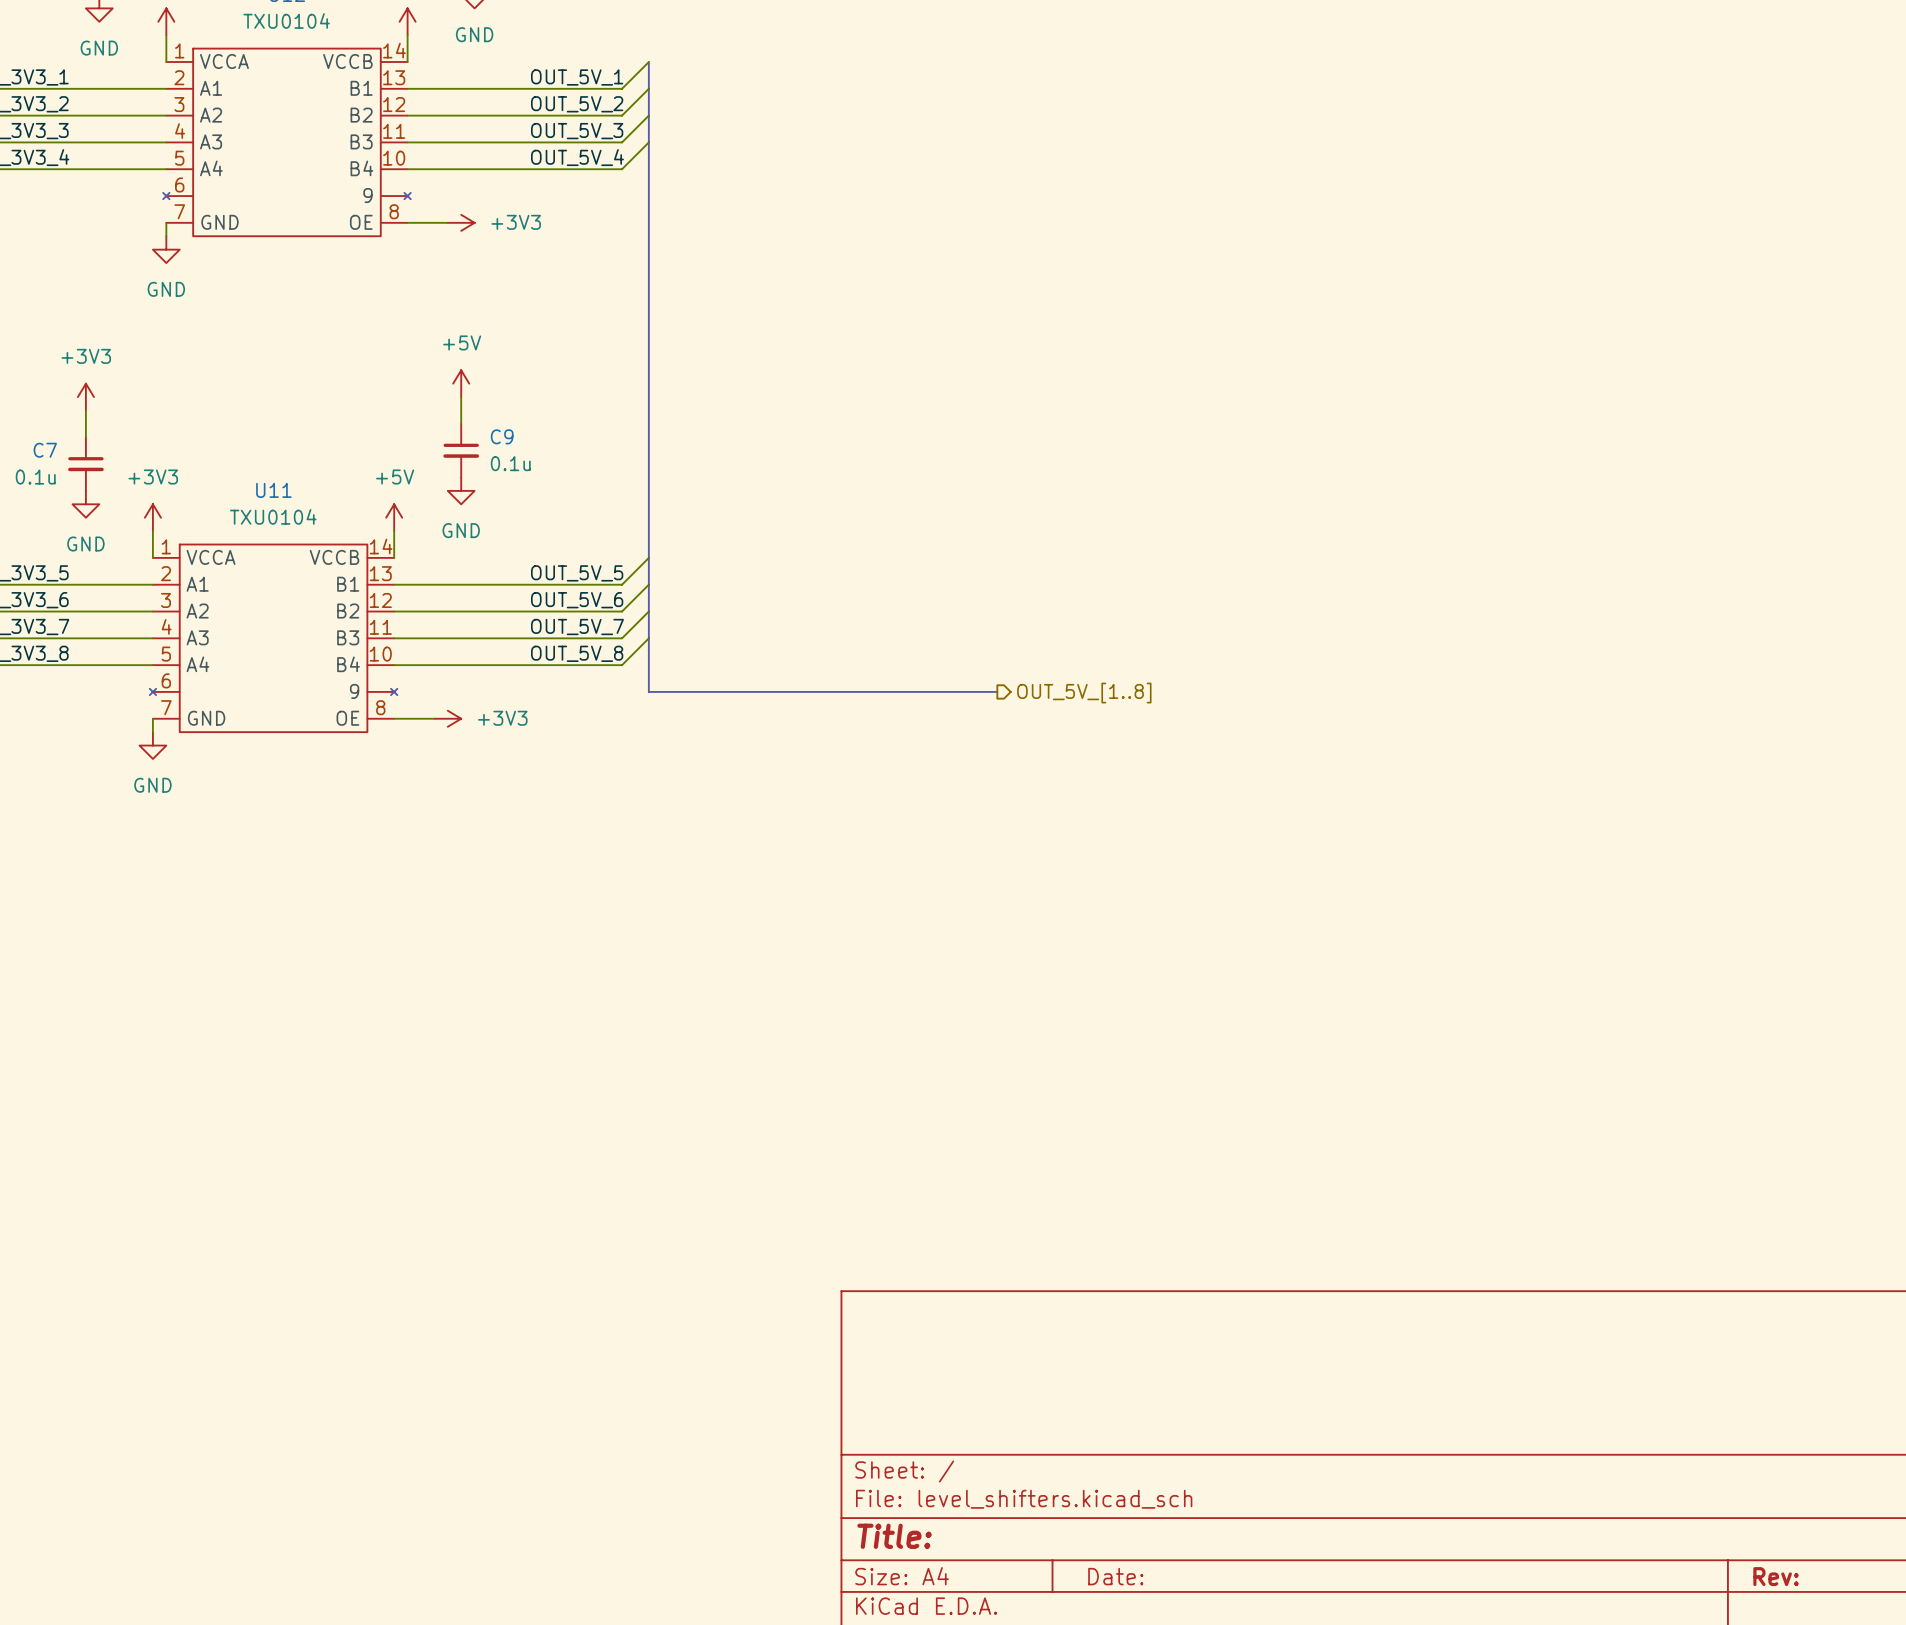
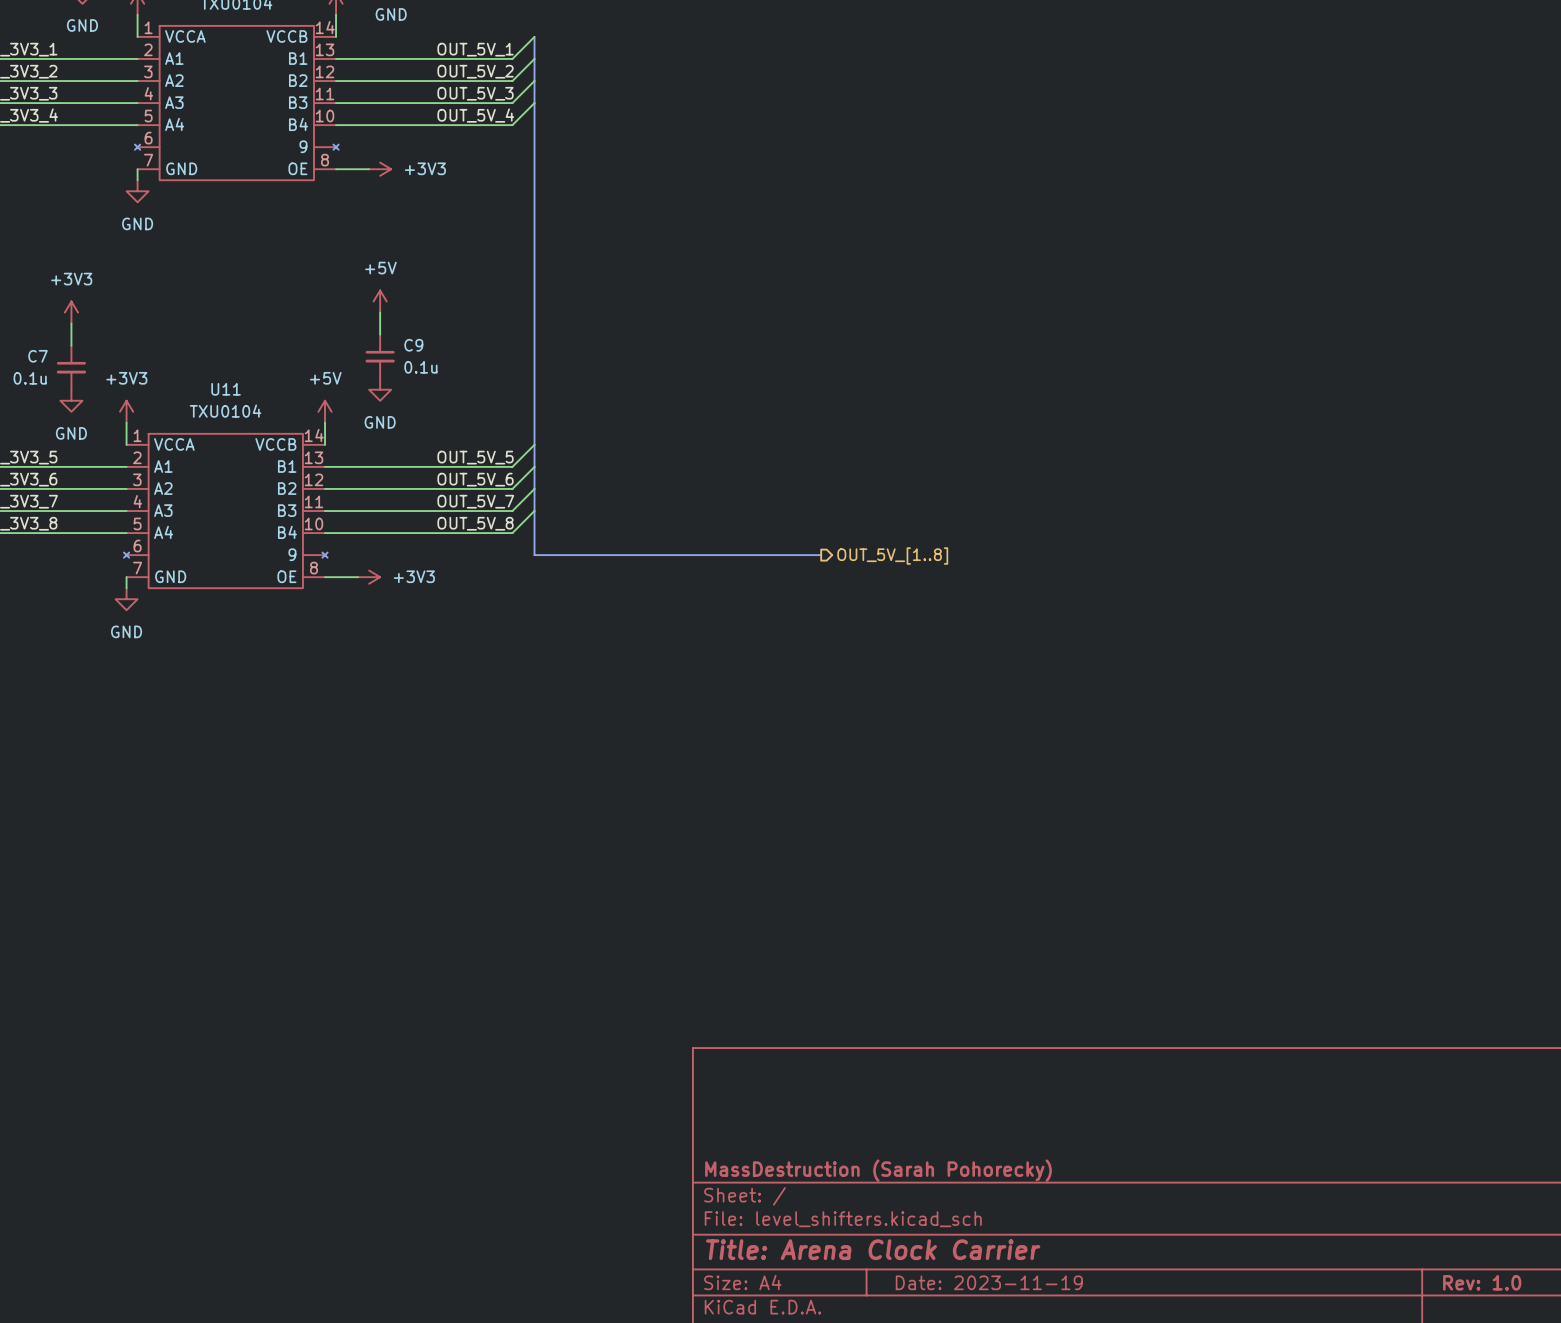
title block: none -> MassDestruction (Sarah Pohorecky) (878, 1170)
title block: Title: (894, 1536) -> Title: Arena Clock Carrier (873, 1249)
title block: Date: (1115, 1576) -> Date: 2023-11-19 (989, 1282)
title block: Rev: (1776, 1576) -> Rev: 1.0 (1482, 1282)

